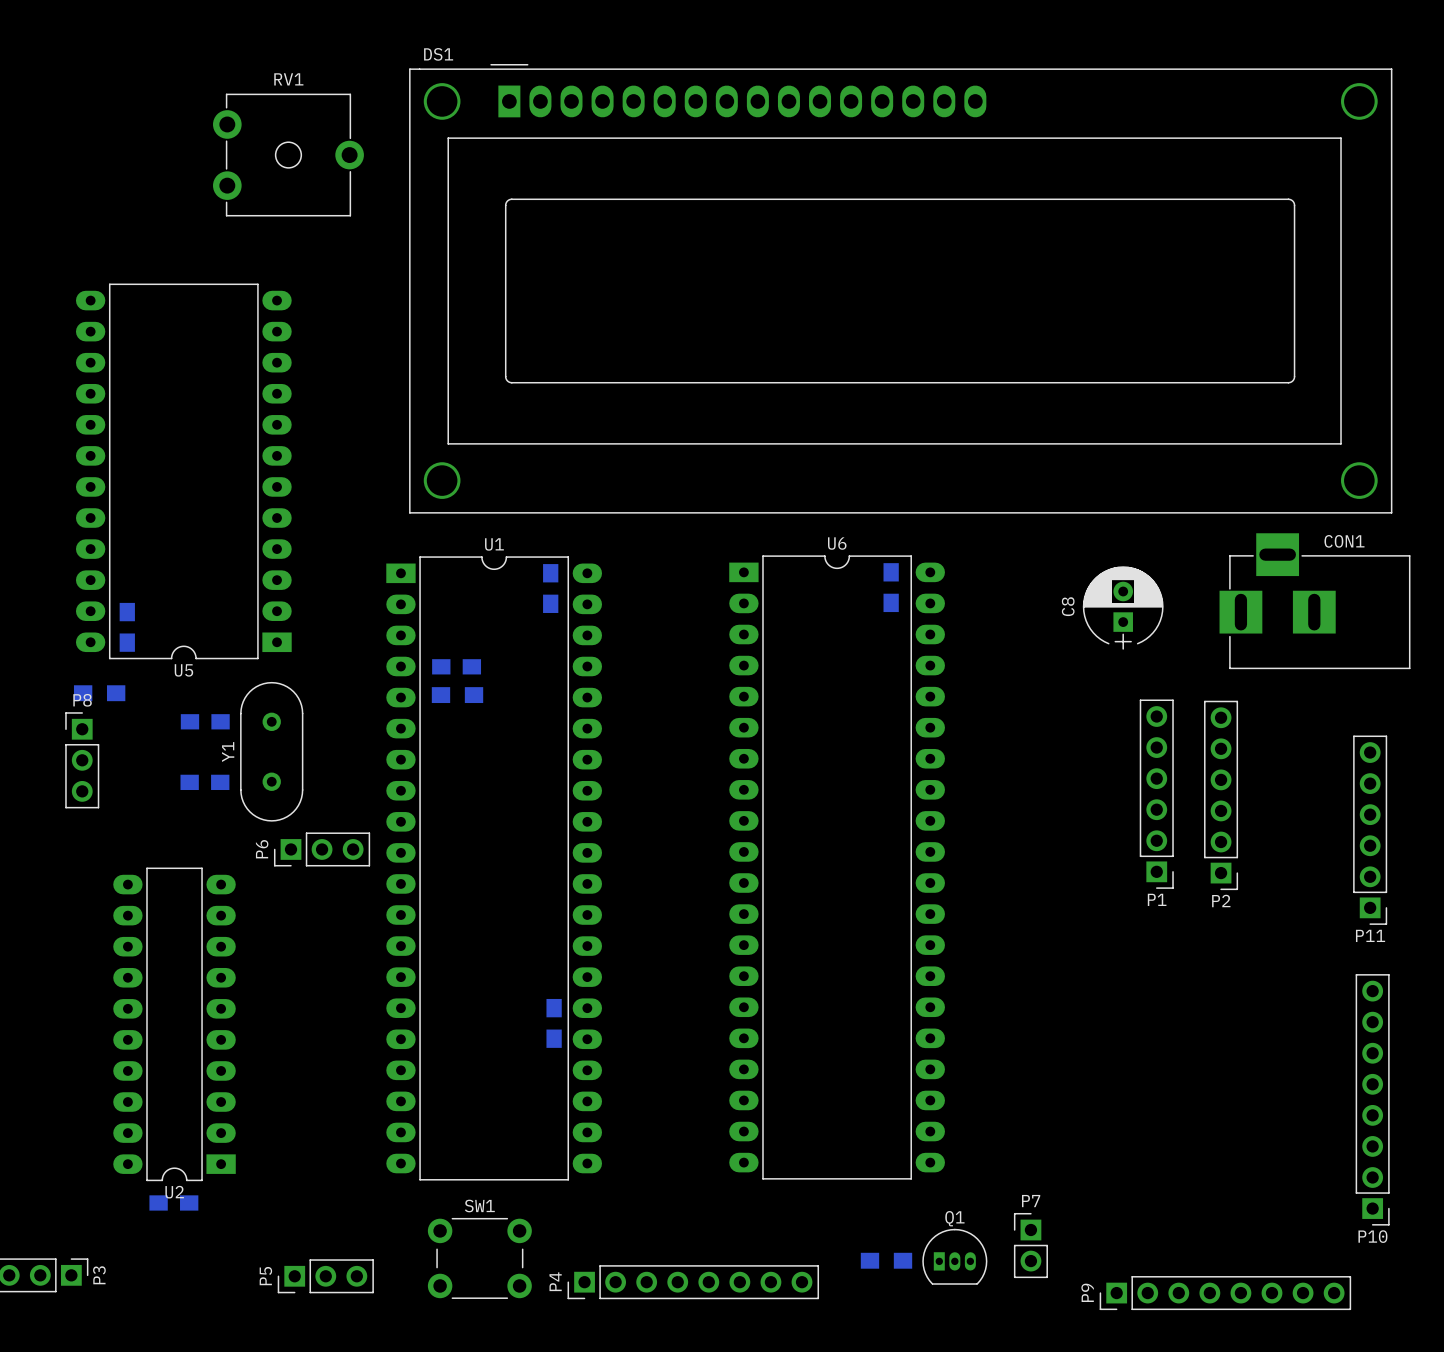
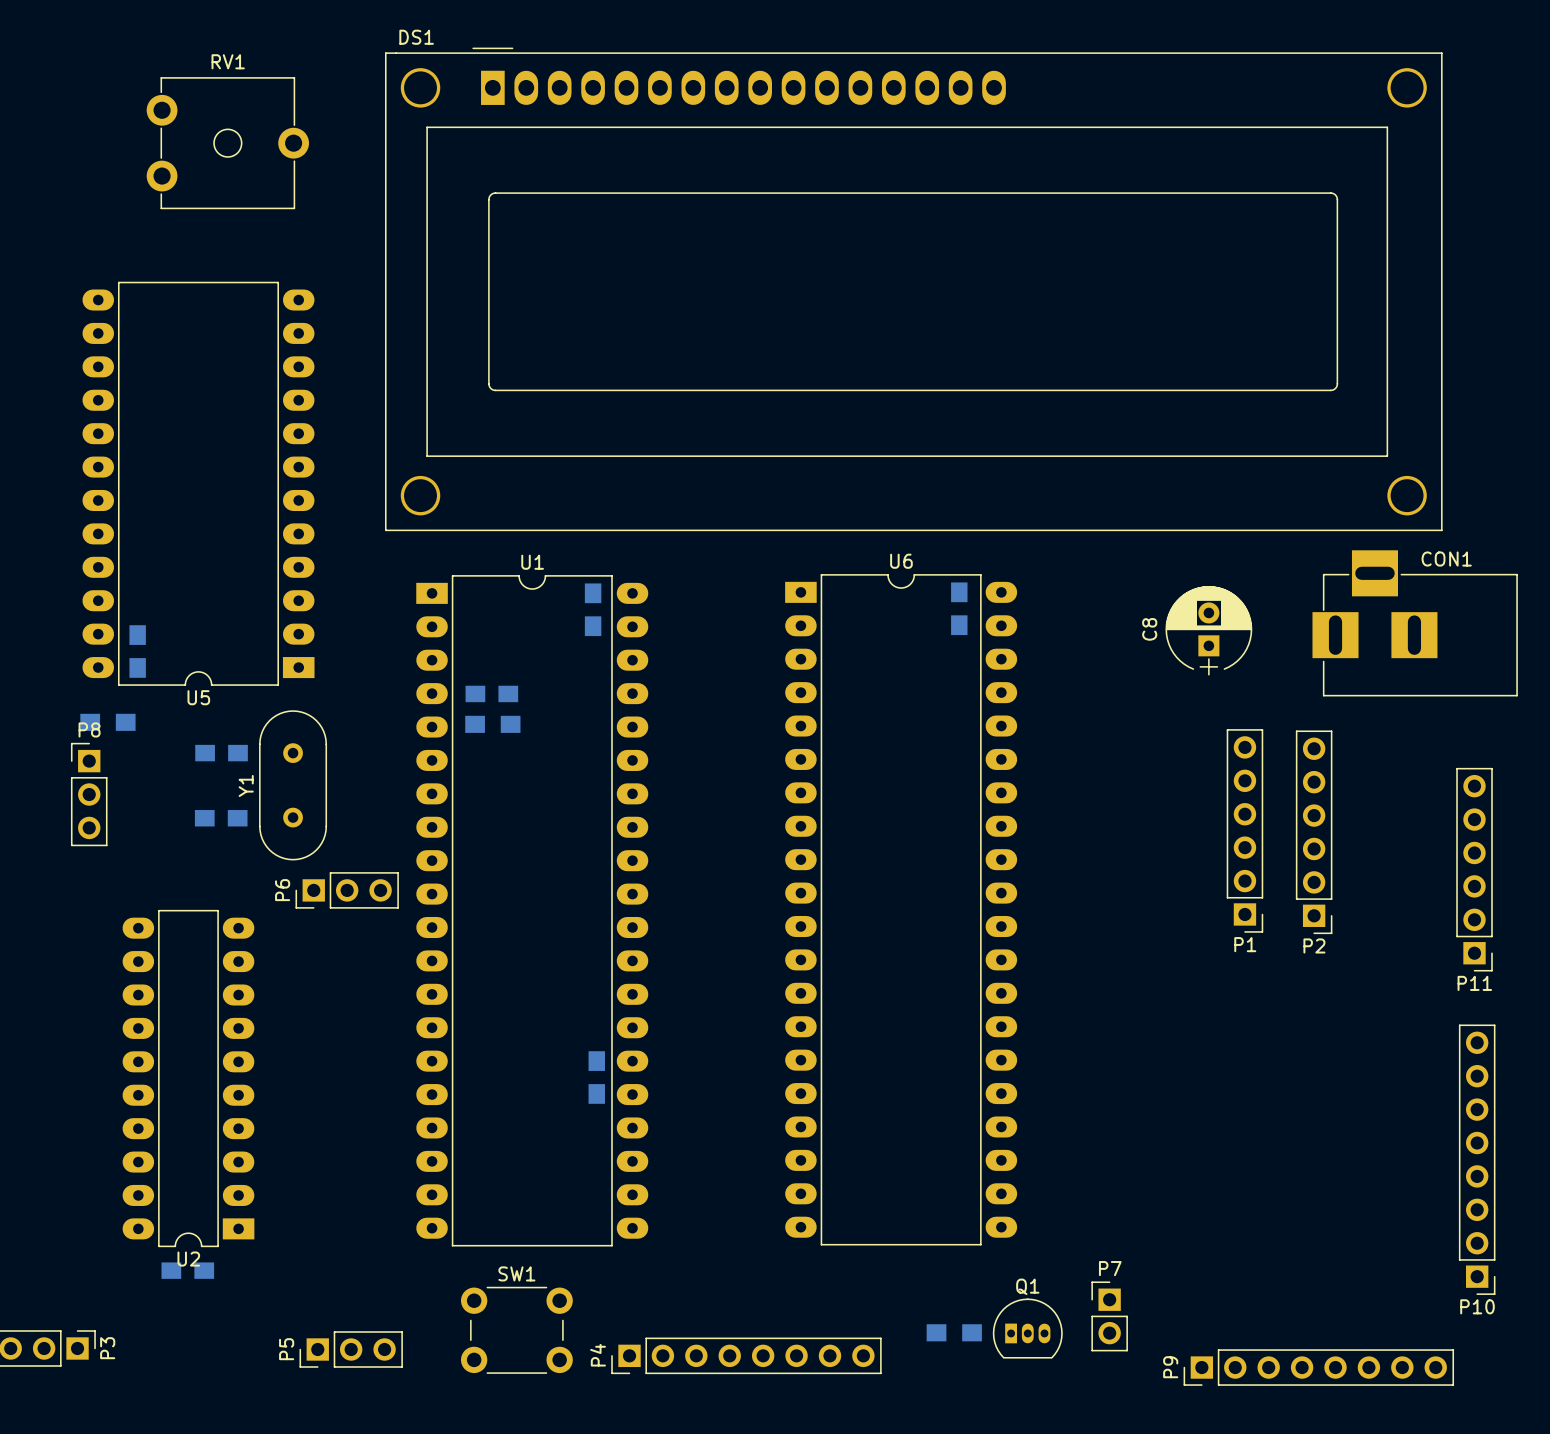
DS1 footprint: [409, 64, 1393, 514] -> [384, 47, 1443, 532]
RV1 position: (288, 155) -> (227, 143)

